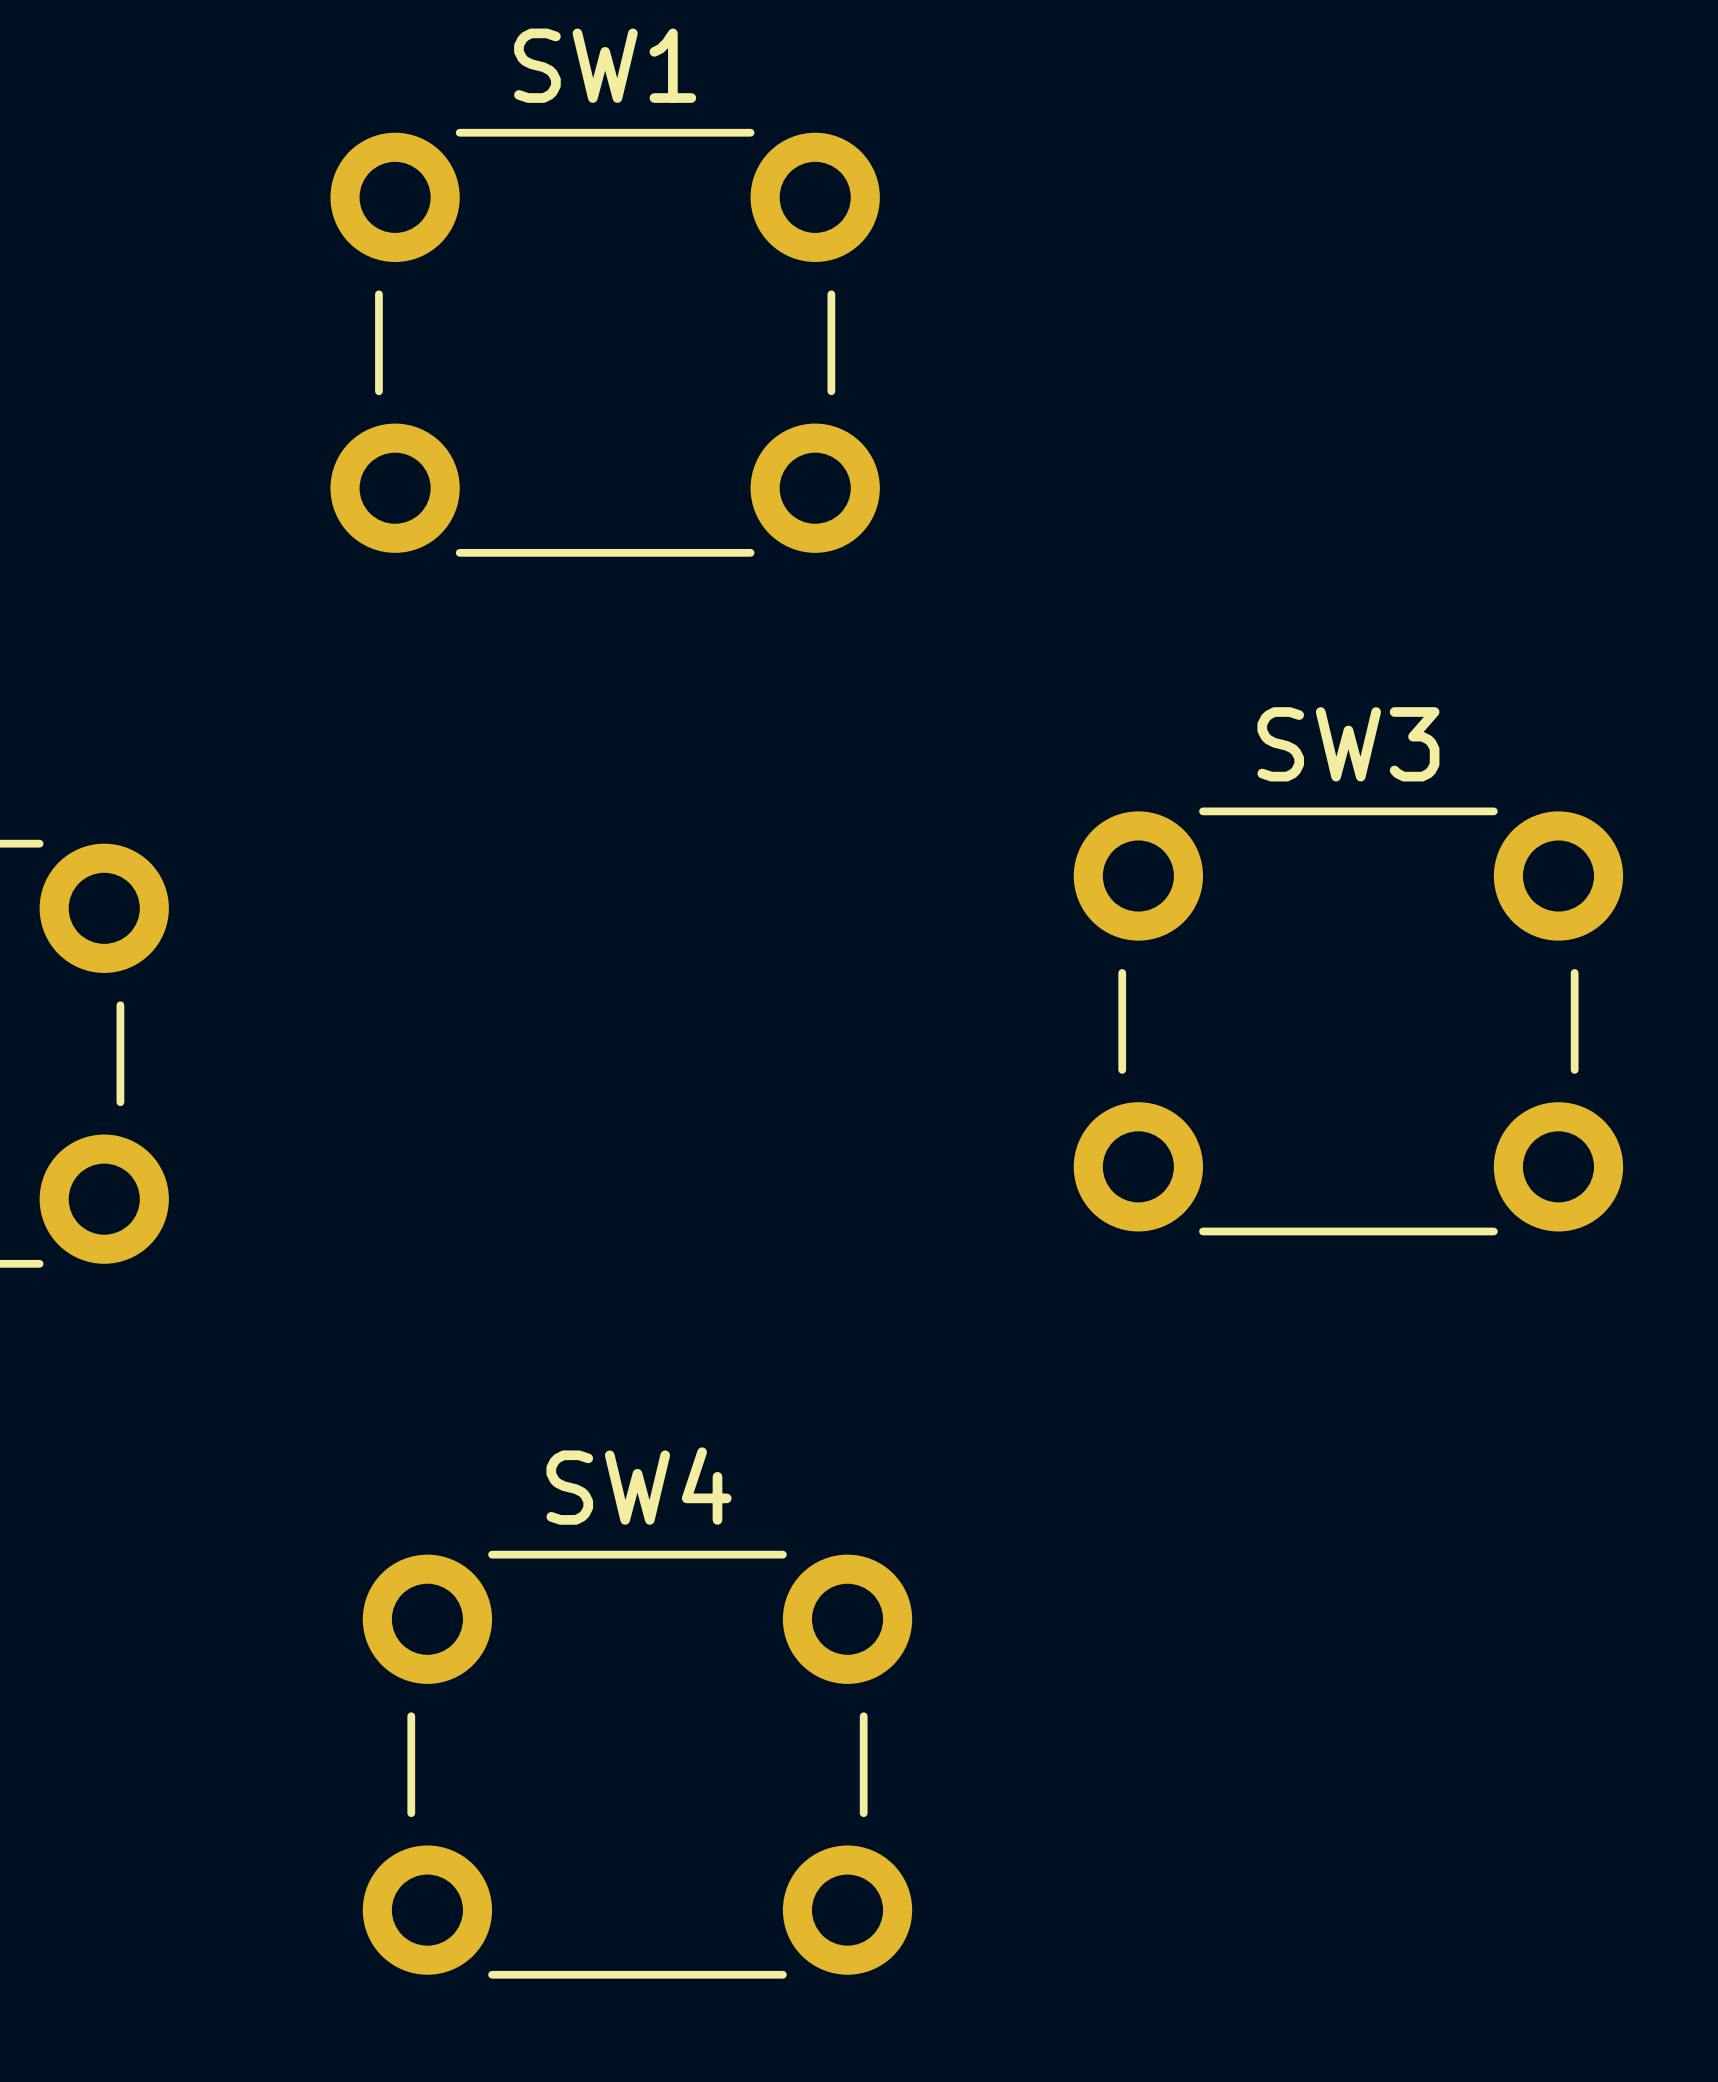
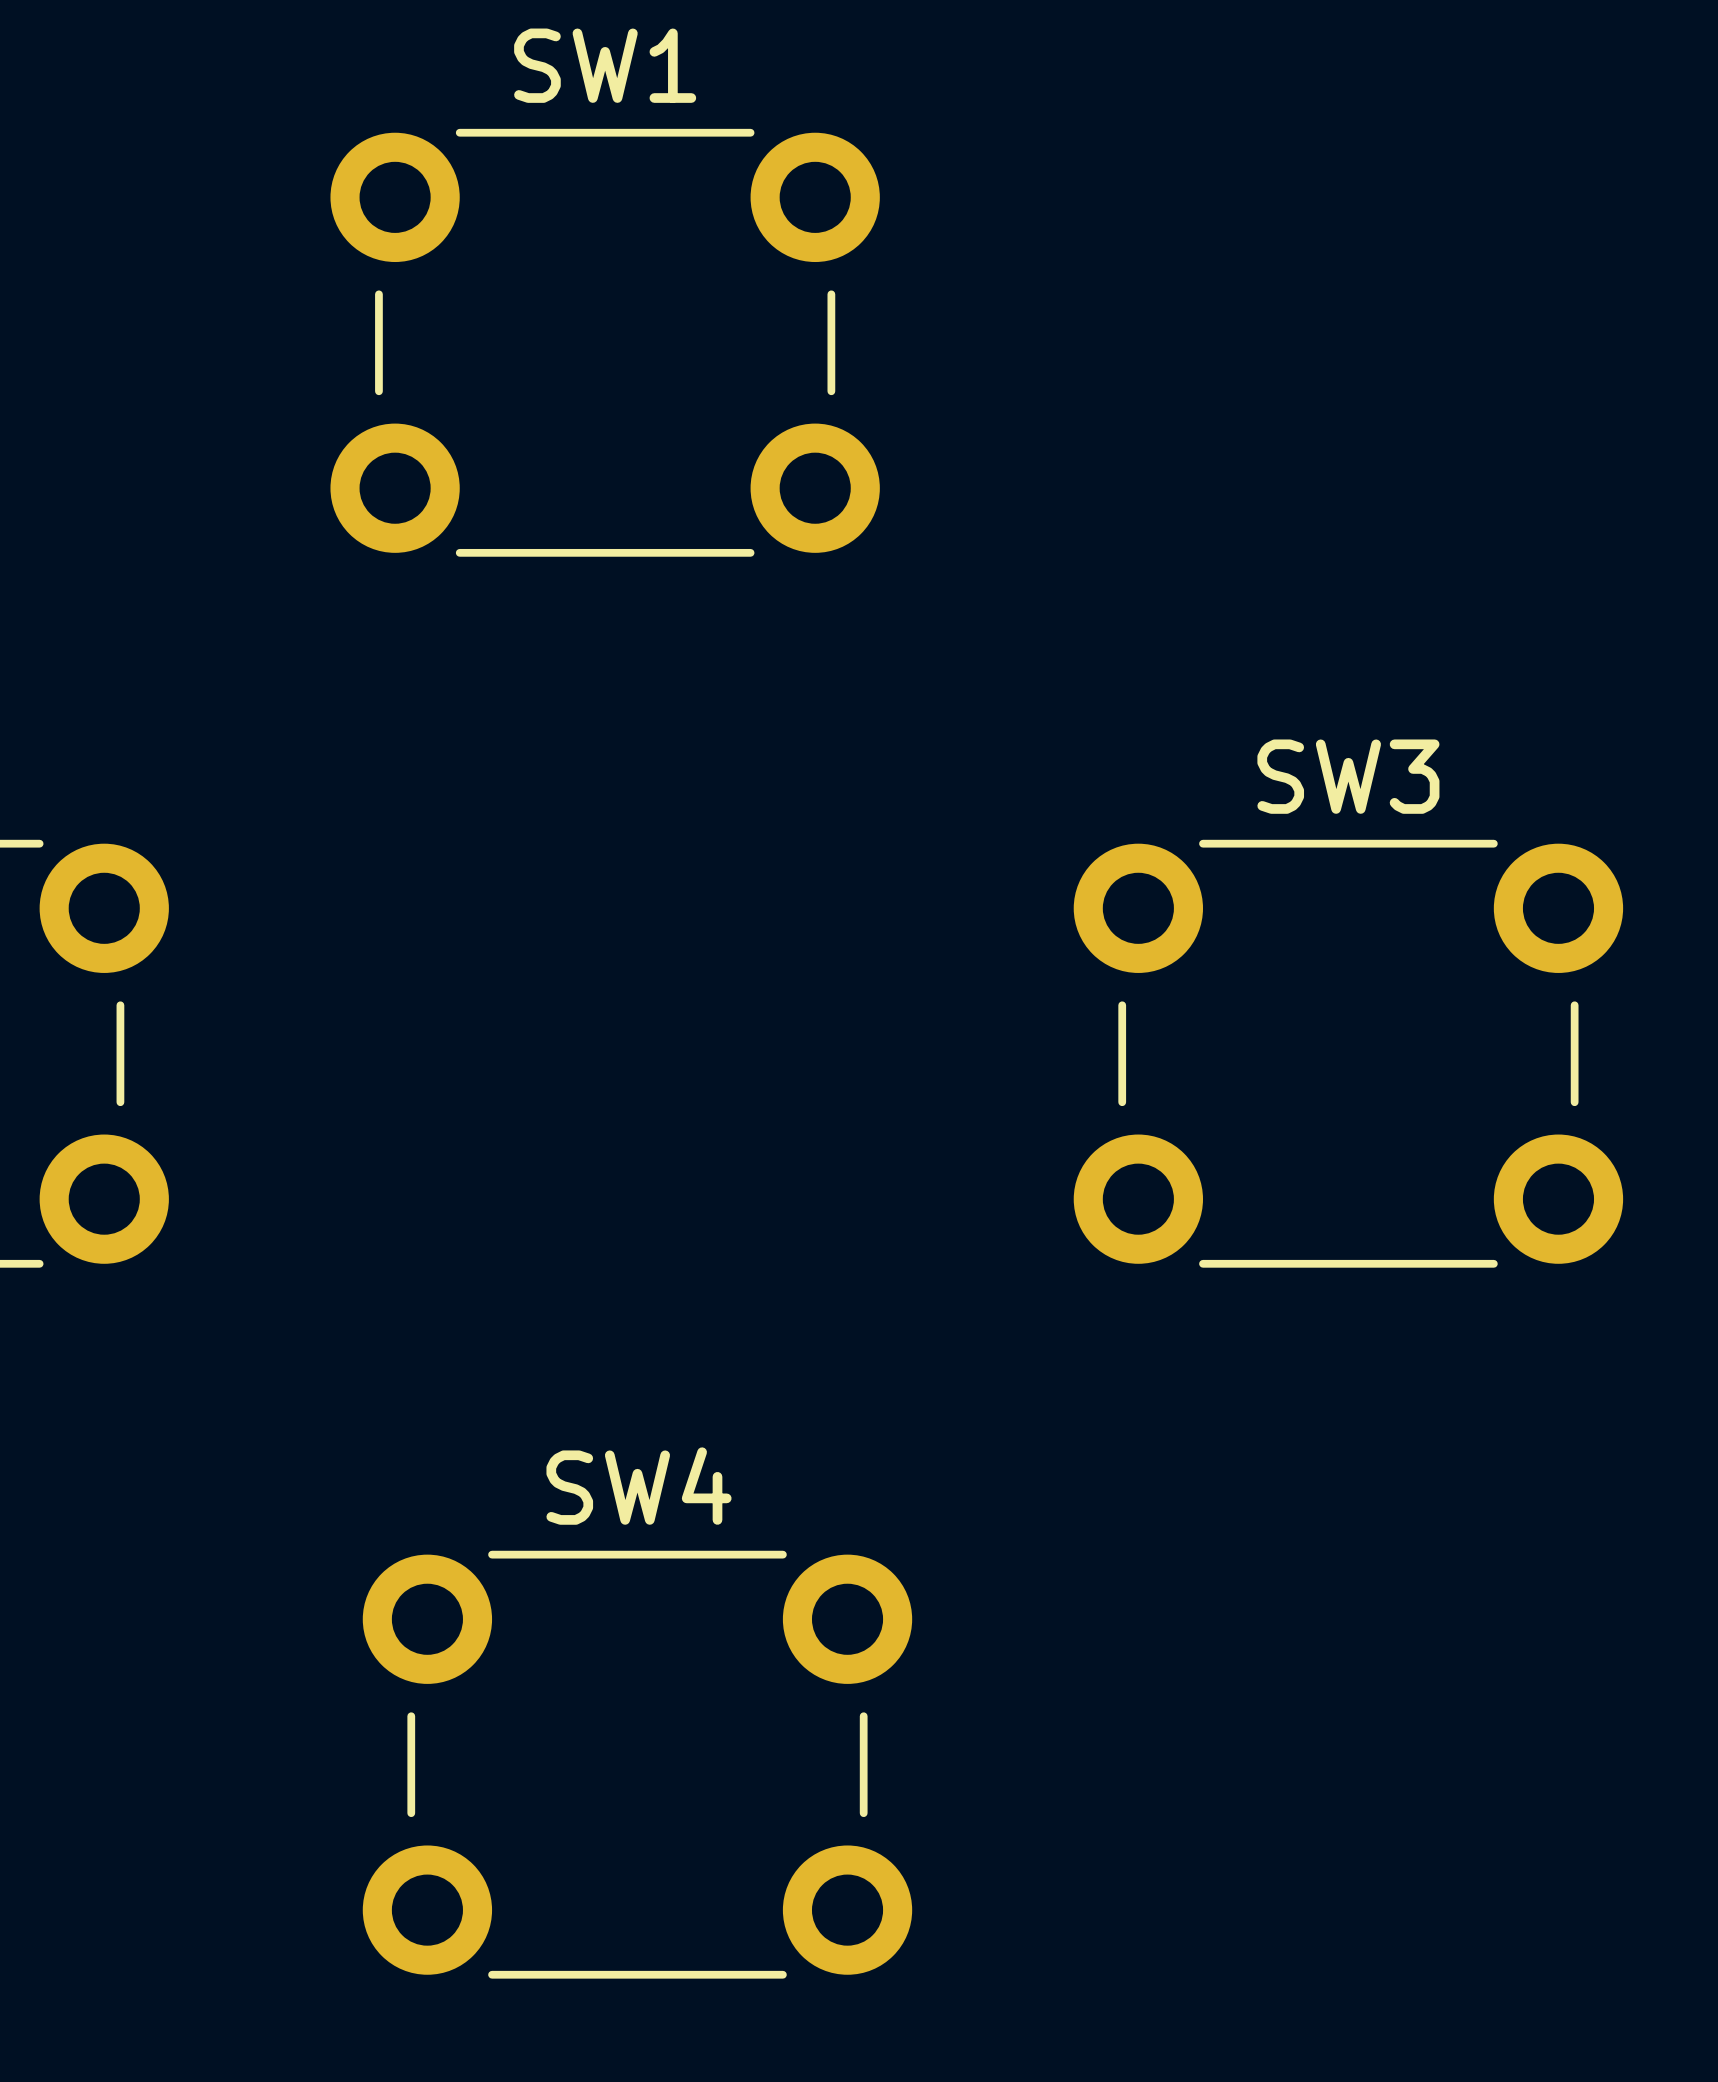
SW3 position: (1348, 1021) -> (1348, 1053)

